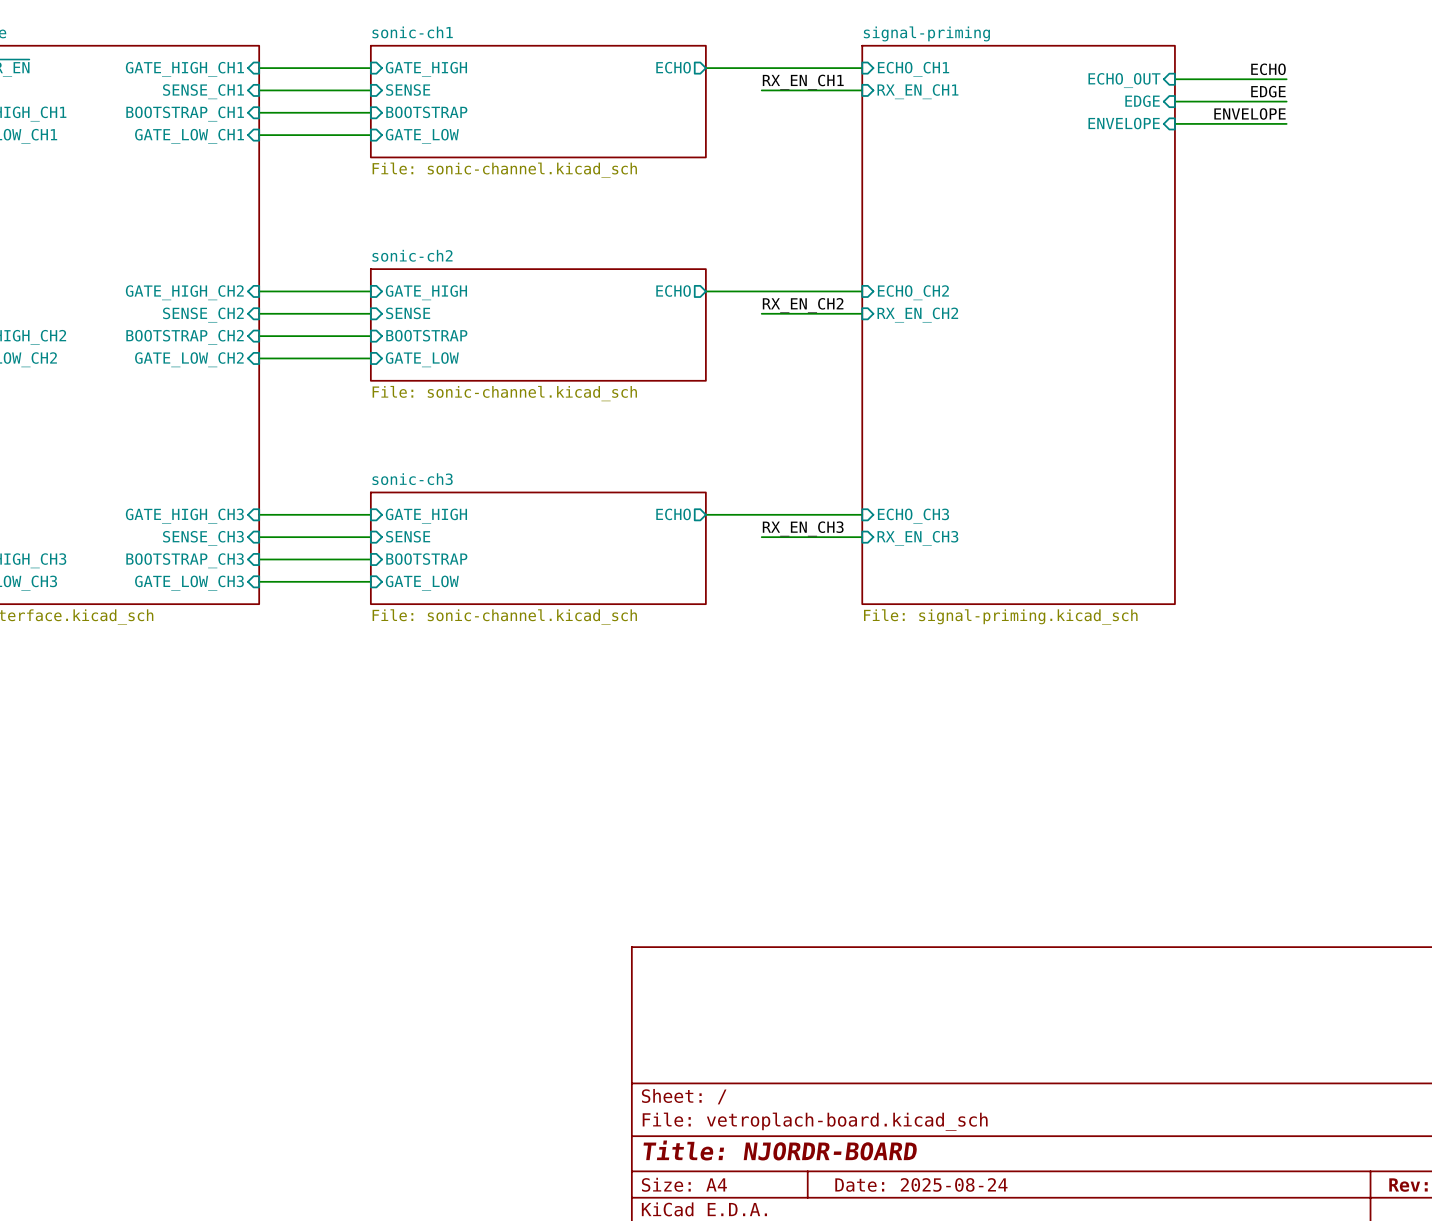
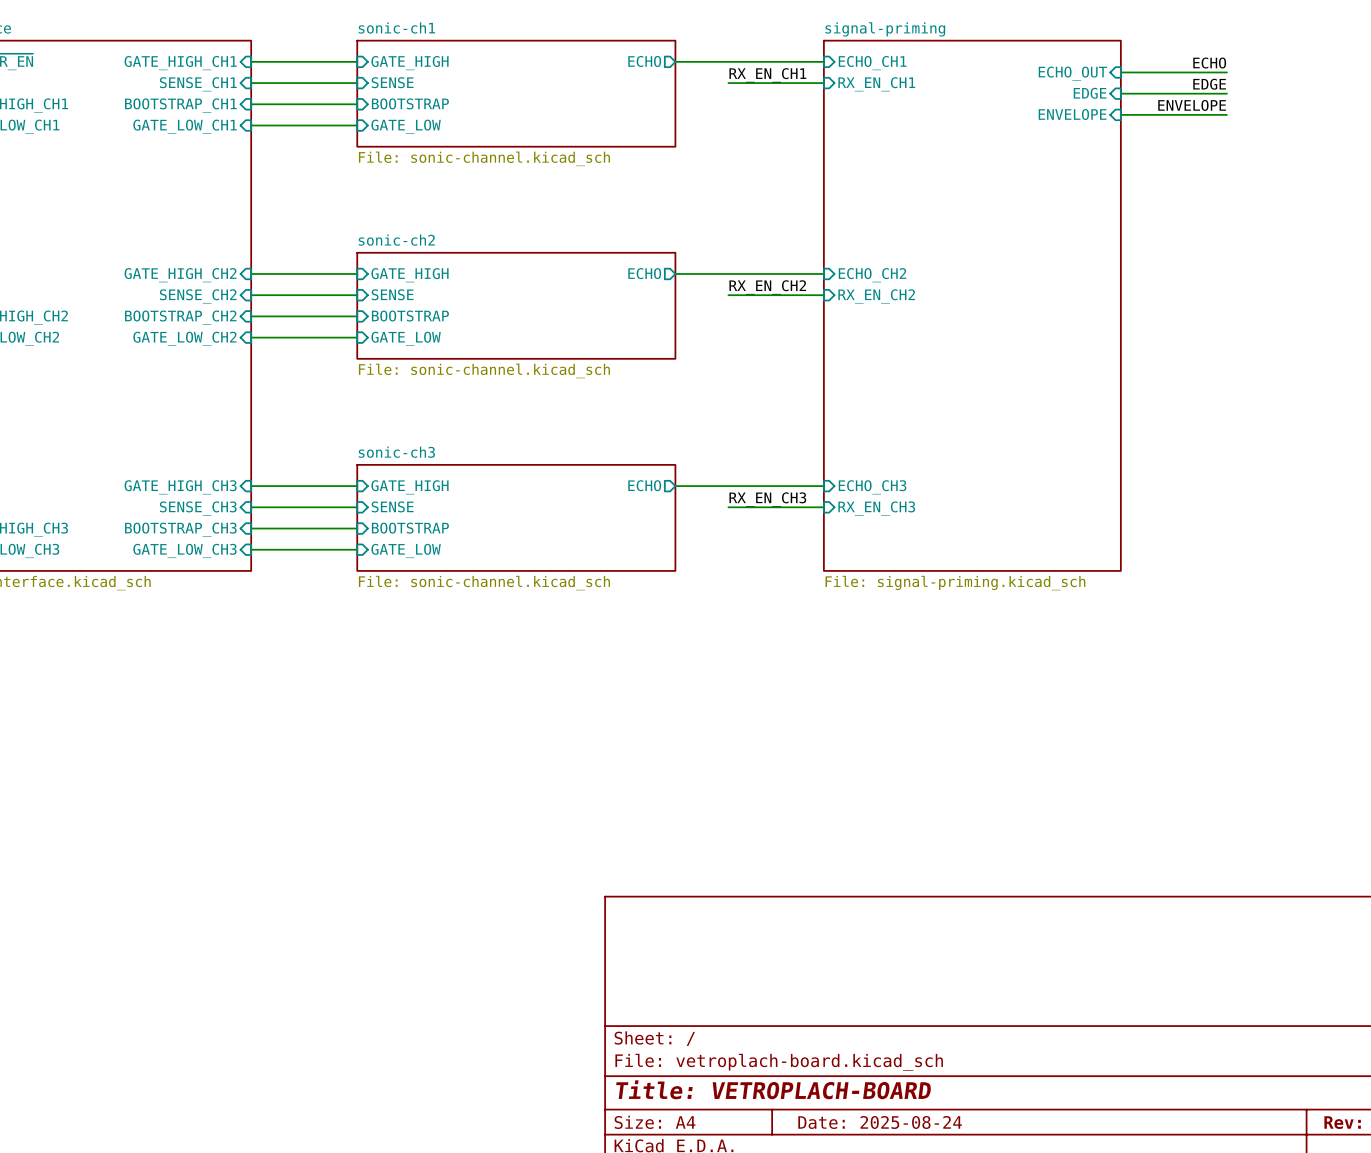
title block: Title: NJORDR-BOARD (780, 1150) -> Title: VETROPLACH-BOARD (773, 1089)

